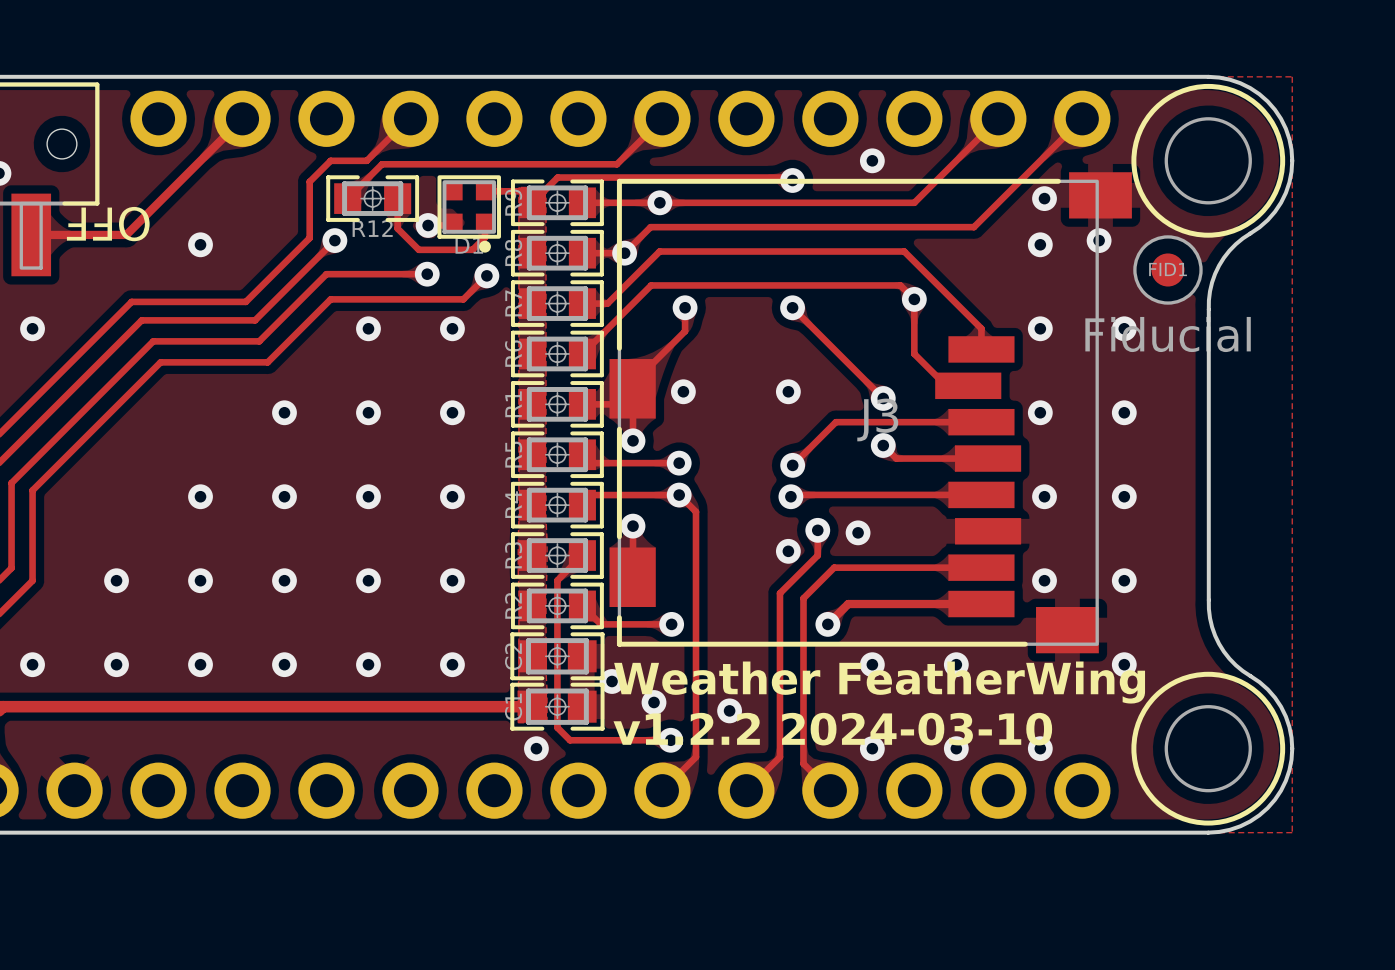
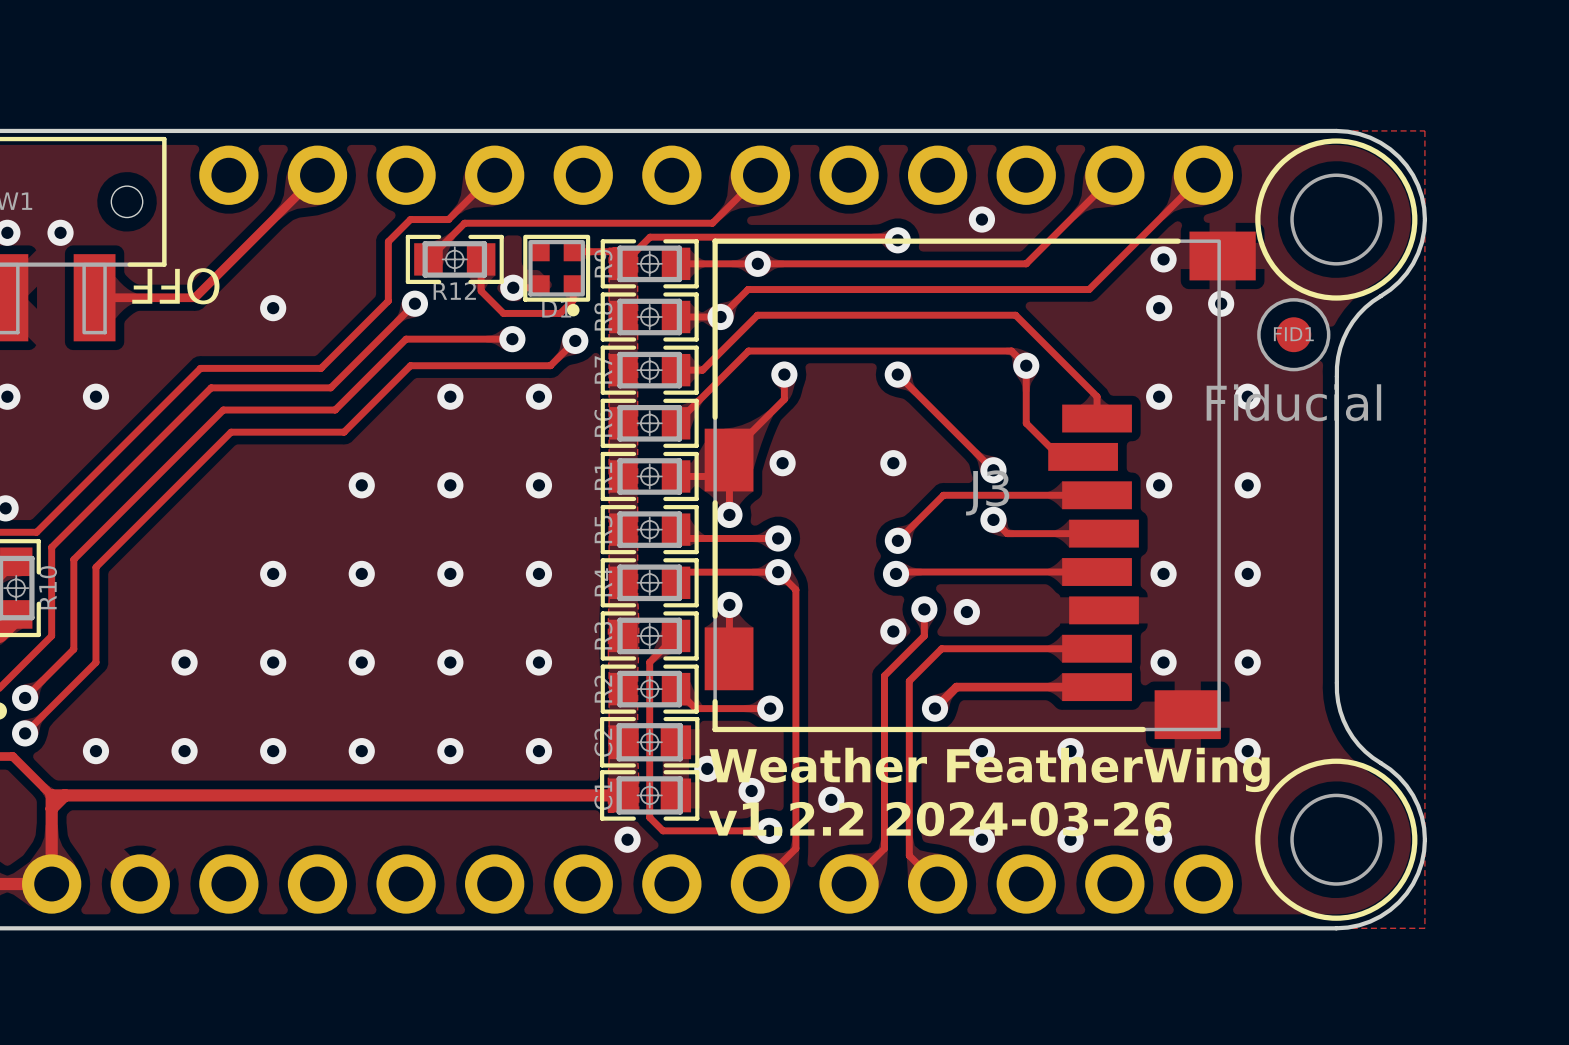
text: v1.2.2 2024-03-10 (832, 729) -> v1.2.2 2024-03-26 (940, 819)

